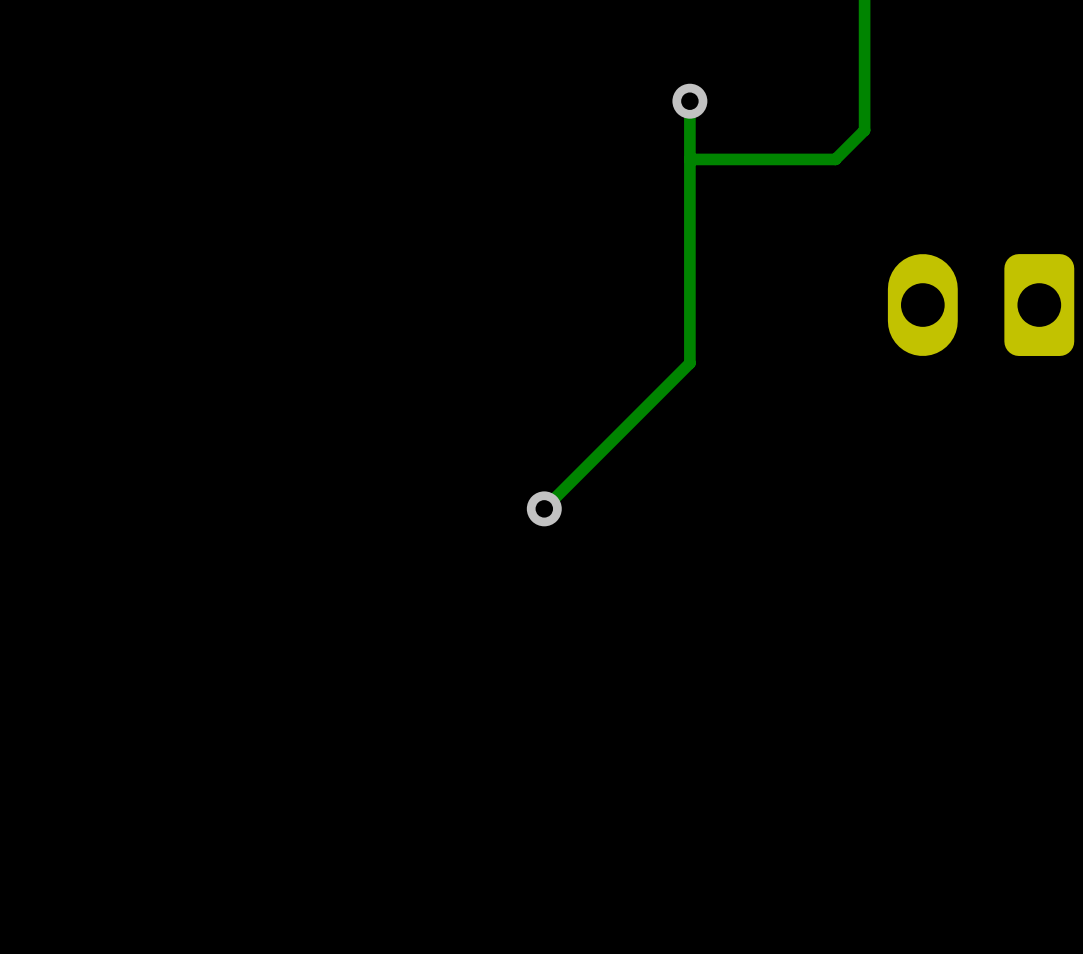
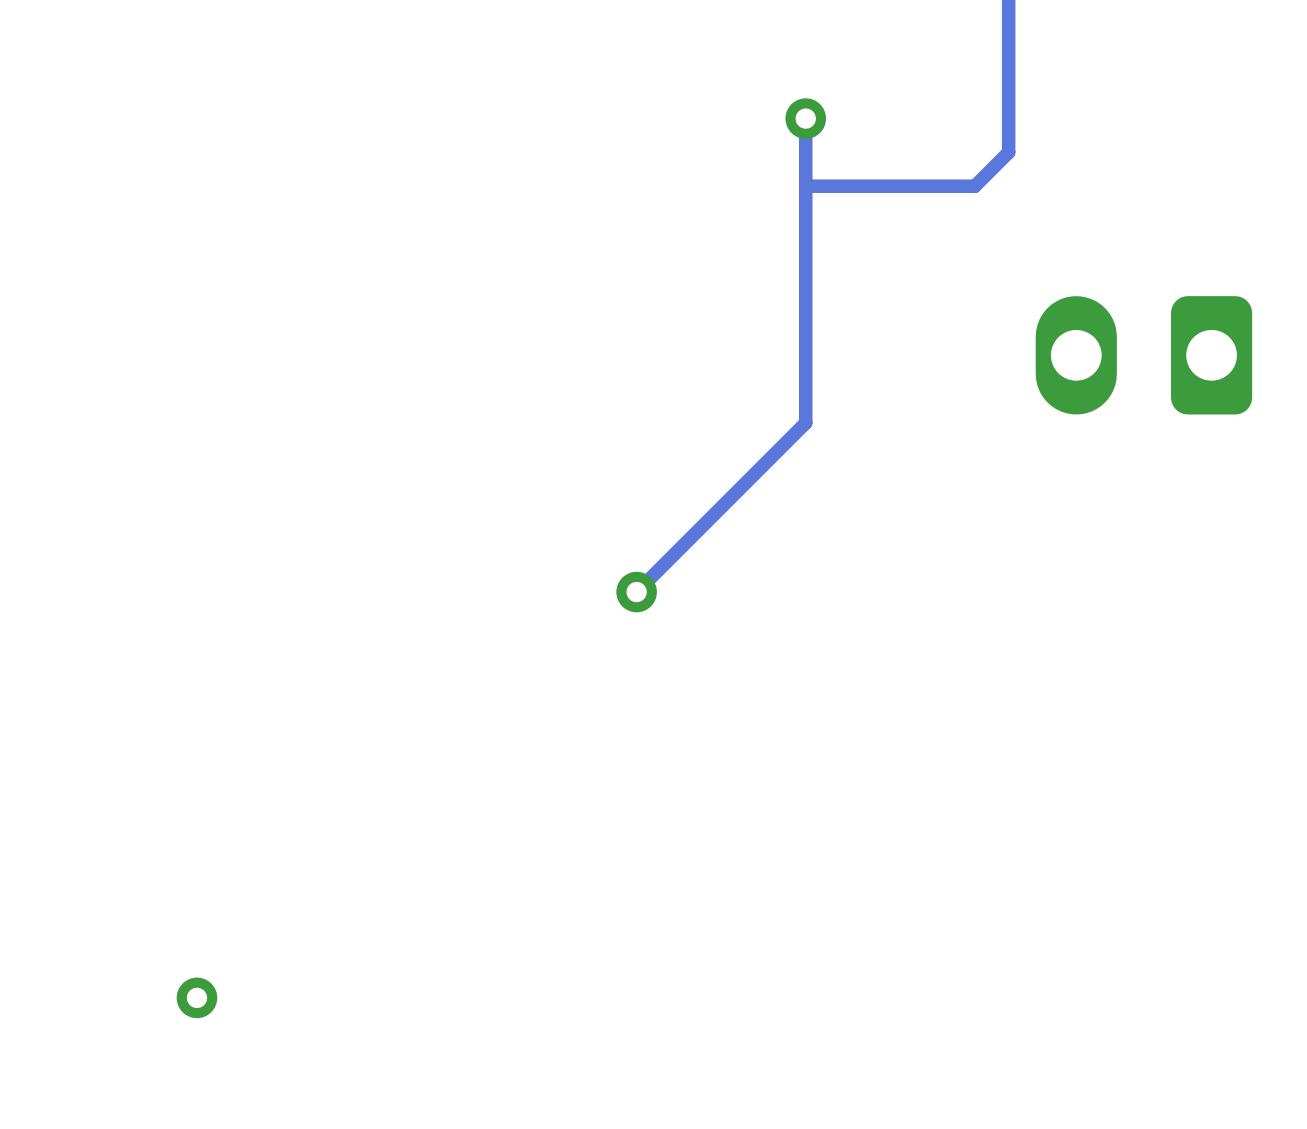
via: none -> (196, 997)

